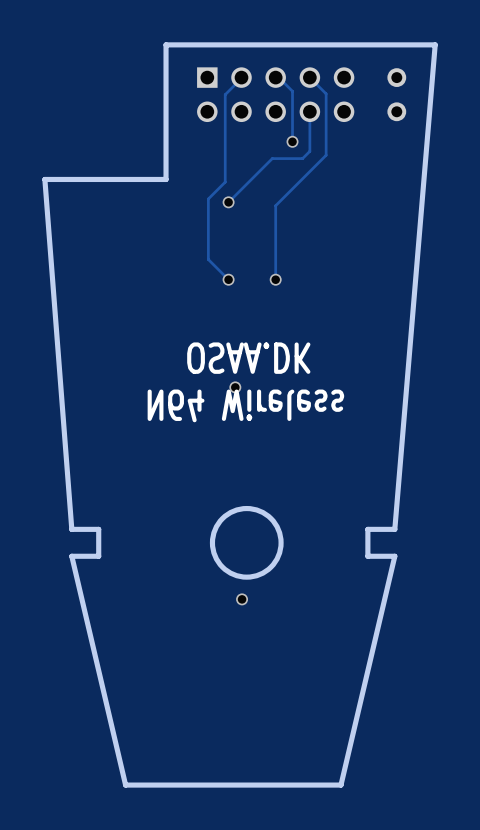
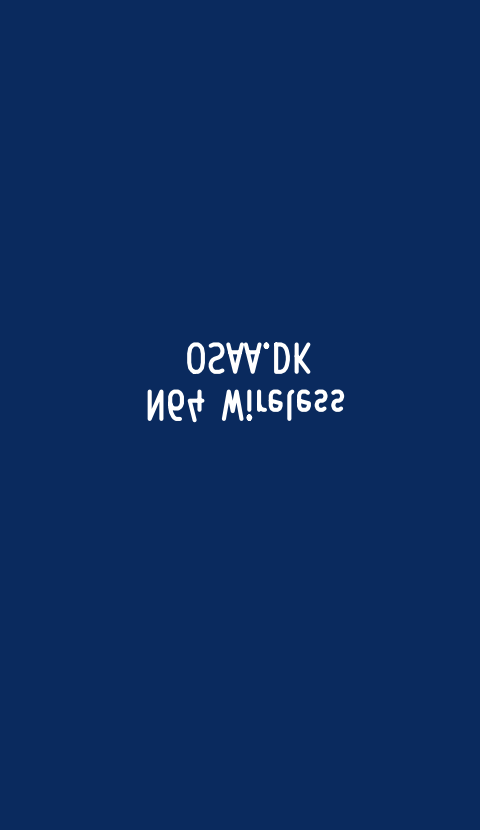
board edge: (435, 44) (394, 529) (367, 529) (367, 556) (394, 556) (340, 785) (125, 785) (71, 556) (98, 556) (98, 529) (71, 529) (44, 179) (166, 179) (166, 44) (435, 44) -> none
track: (241, 77) (225, 94) (225, 182) (208, 198) (208, 259) (228, 279) -> none
track: (275, 77) (278, 77) (292, 91) (292, 141) -> none
track: (309, 77) (326, 93) (326, 155) (275, 205) (275, 279) -> none
part: (275, 94) -> none
part: (396, 94) -> none
track: (309, 111) (309, 151) (302, 158) (272, 158) (228, 202) -> none
via: (292, 141) -> none
via: (228, 202) -> none
via: (228, 279) -> none
via: (275, 279) -> none
via: (235, 387) -> none
round board edge: [209, 505, 284, 580] -> none
via: (242, 599) -> none

